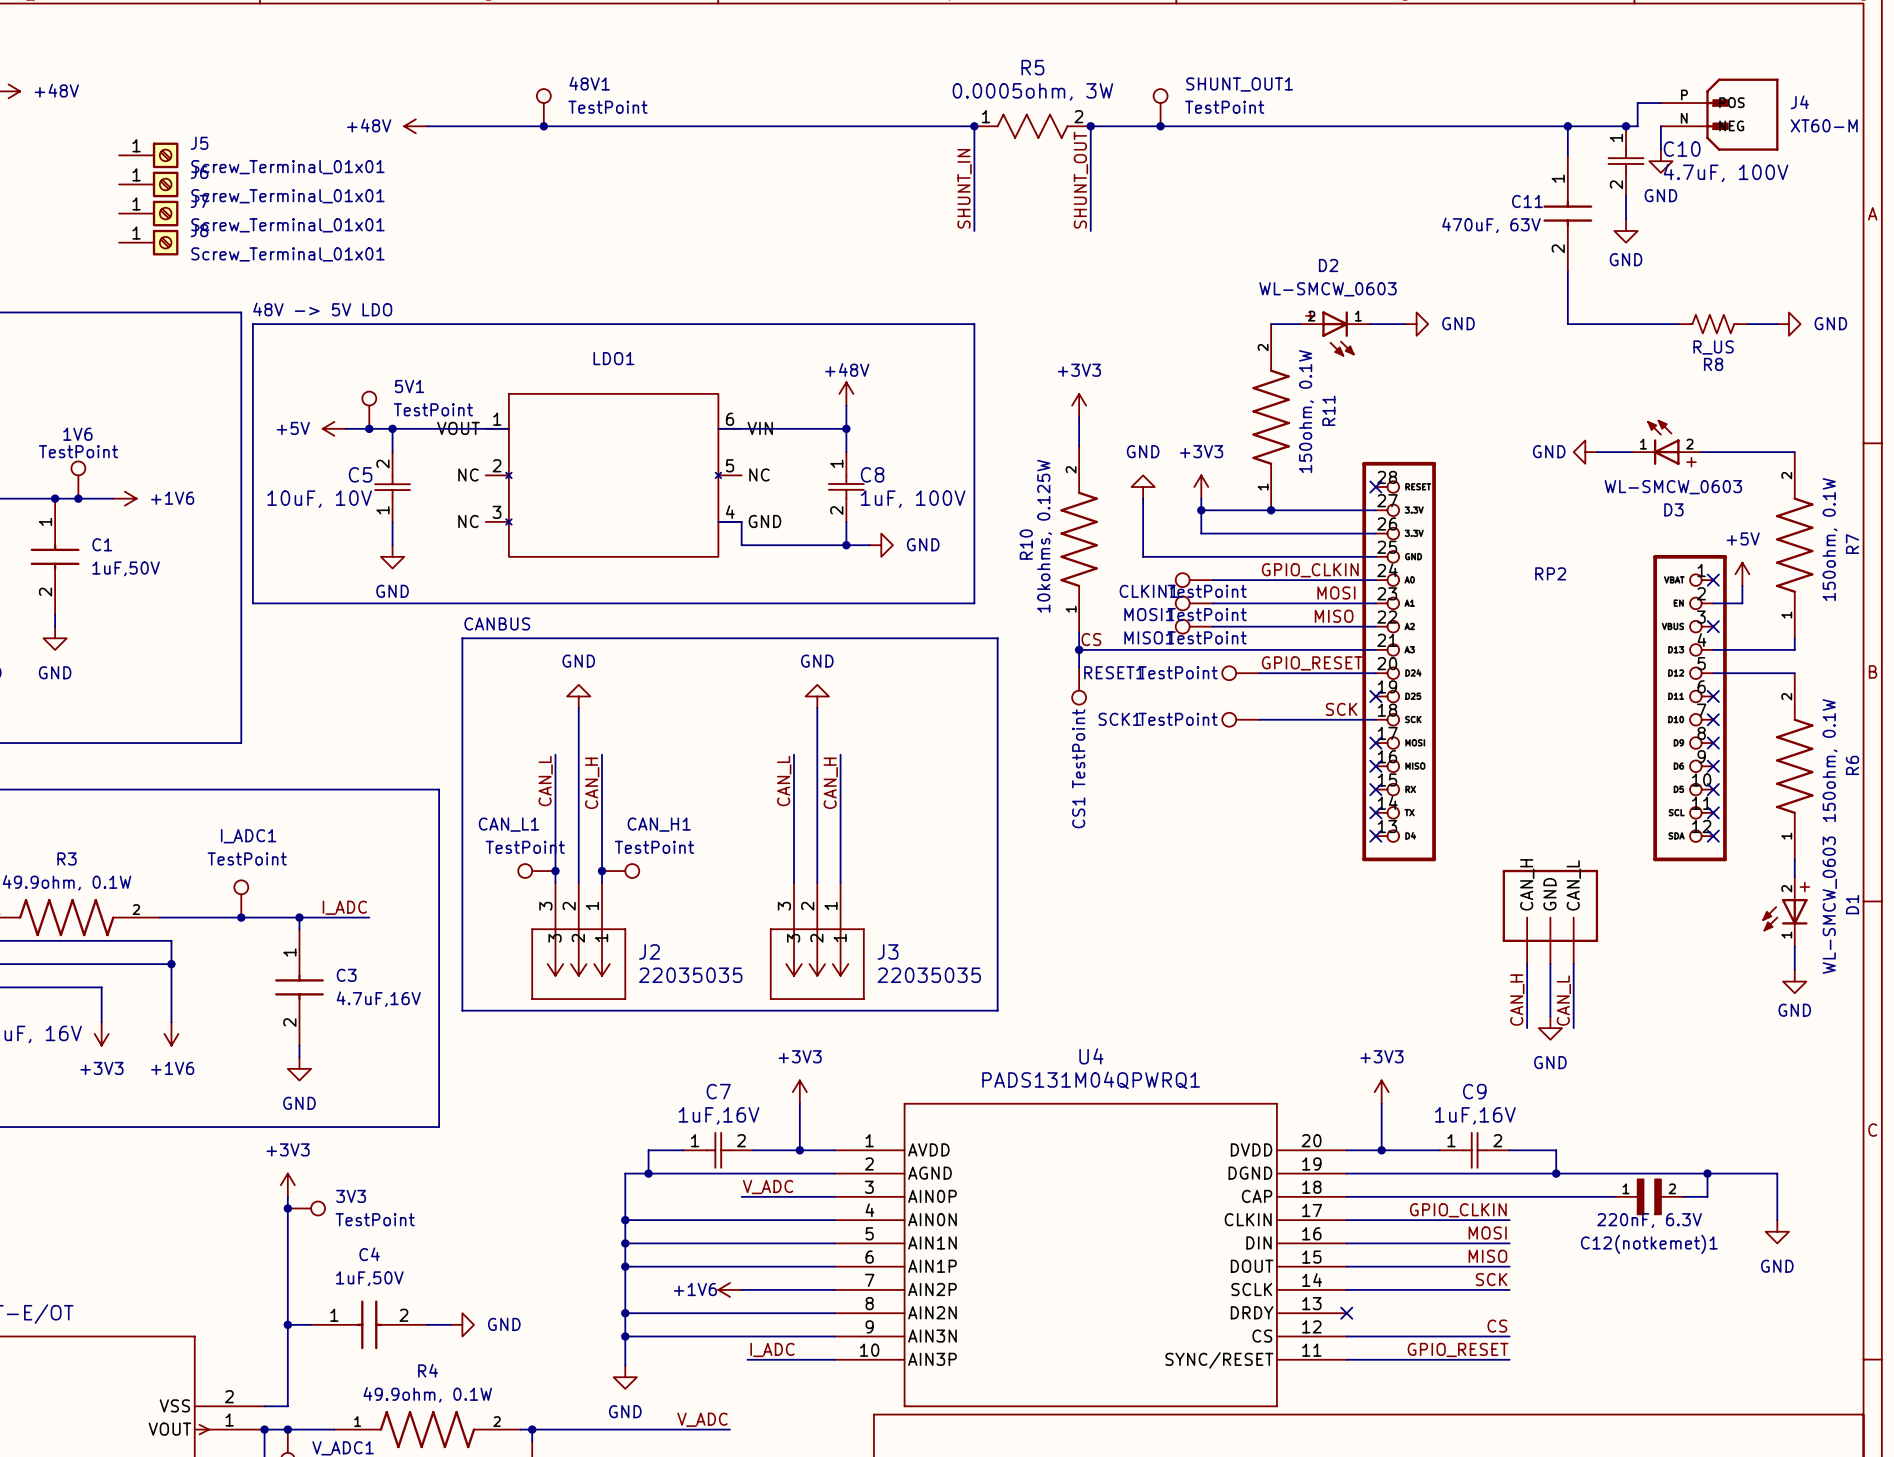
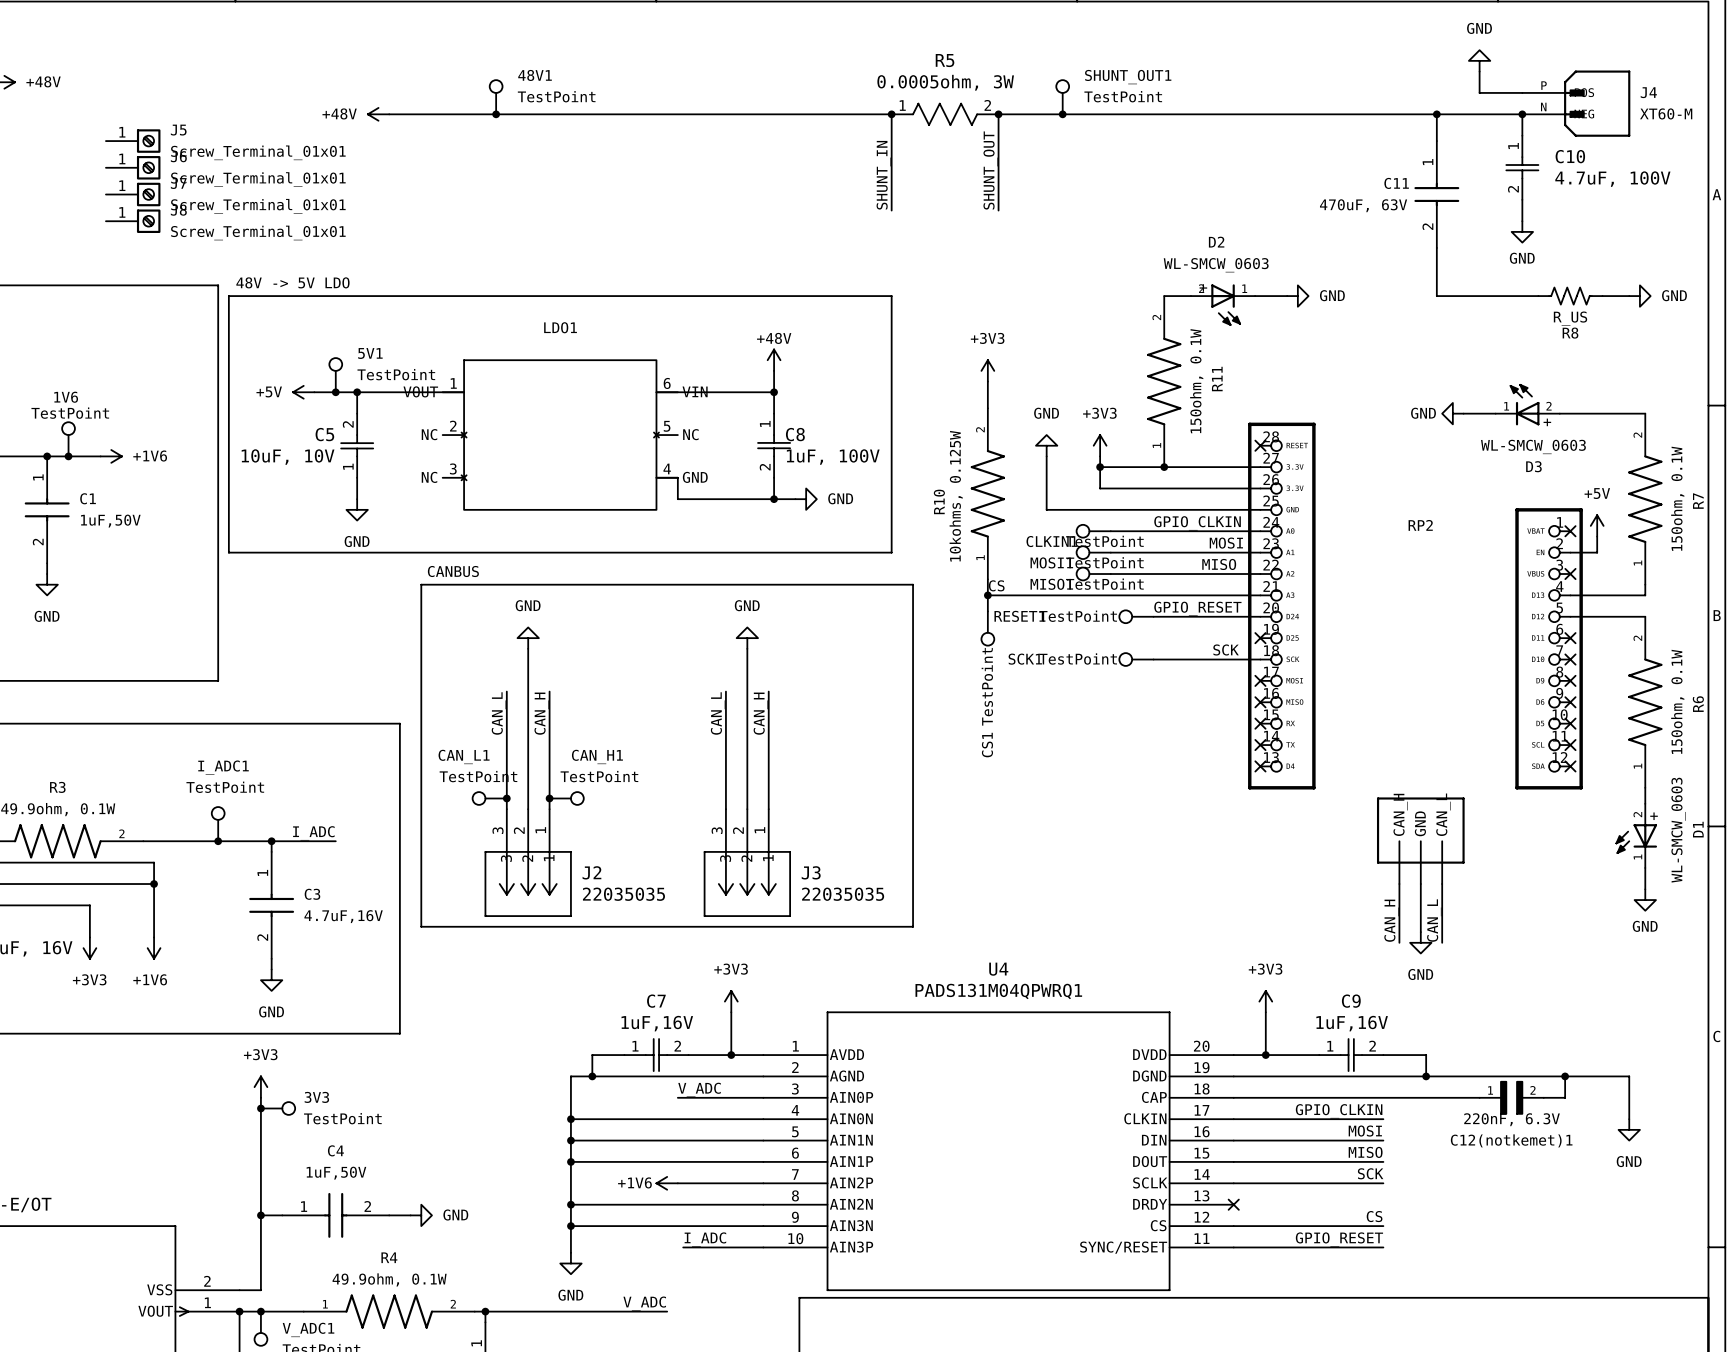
power symbol: none -> GND (1479, 60)
wire: none -> (1479, 71) (1479, 92) (1500, 92)
wire: (1637, 103) (1637, 126) -> (1522, 114) (1500, 114)
junction position: (1626, 126) -> (1522, 114)
C10 position: (1626, 161) -> (1522, 167)
power symbol: GND (1660, 161) -> none
wire: (1626, 196) (1626, 219) -> (1522, 199) (1522, 221)
power symbol position: GND (1626, 231) -> GND (1522, 231)

